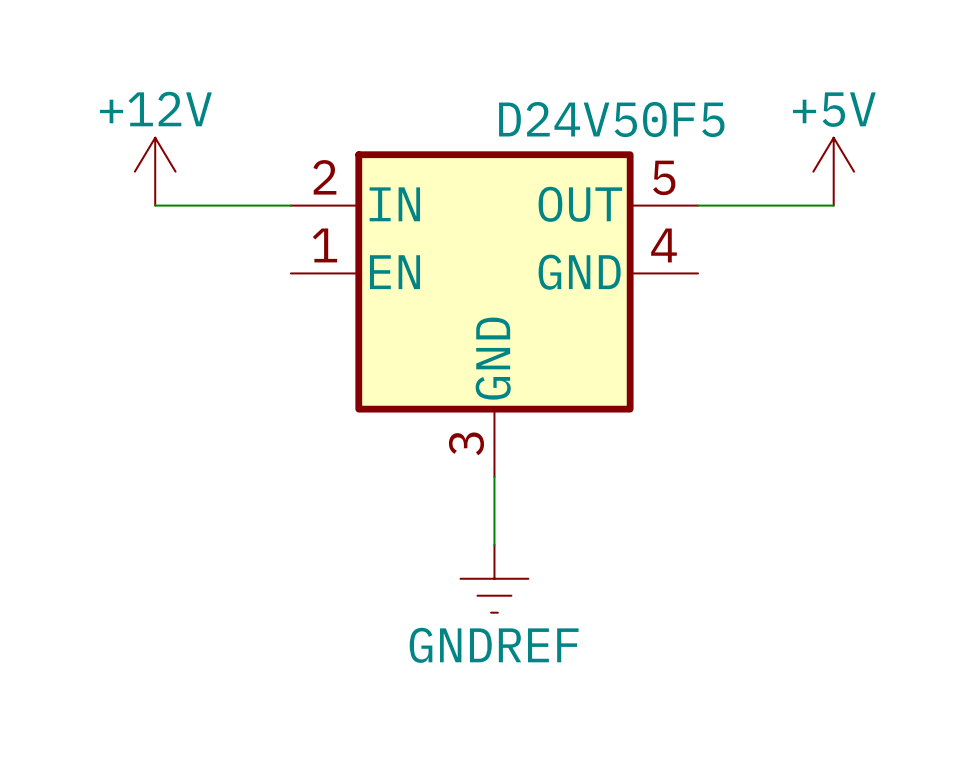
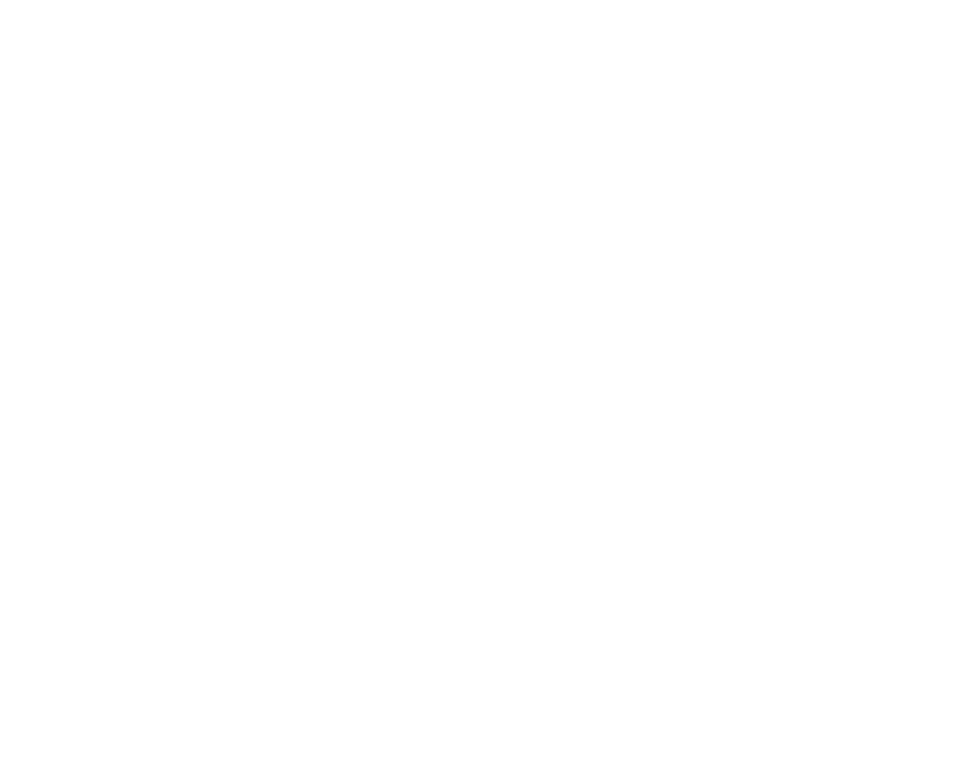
power symbol: +12V (155, 171) -> none
power symbol: +5V (833, 171) -> none
wire: (155, 205) (290, 205) -> none
wire: (698, 205) (833, 205) -> none
power symbol: D24V50F5 (494, 314) -> none
wire: (494, 476) (494, 544) -> none
power symbol: GNDREF (494, 578) -> none

